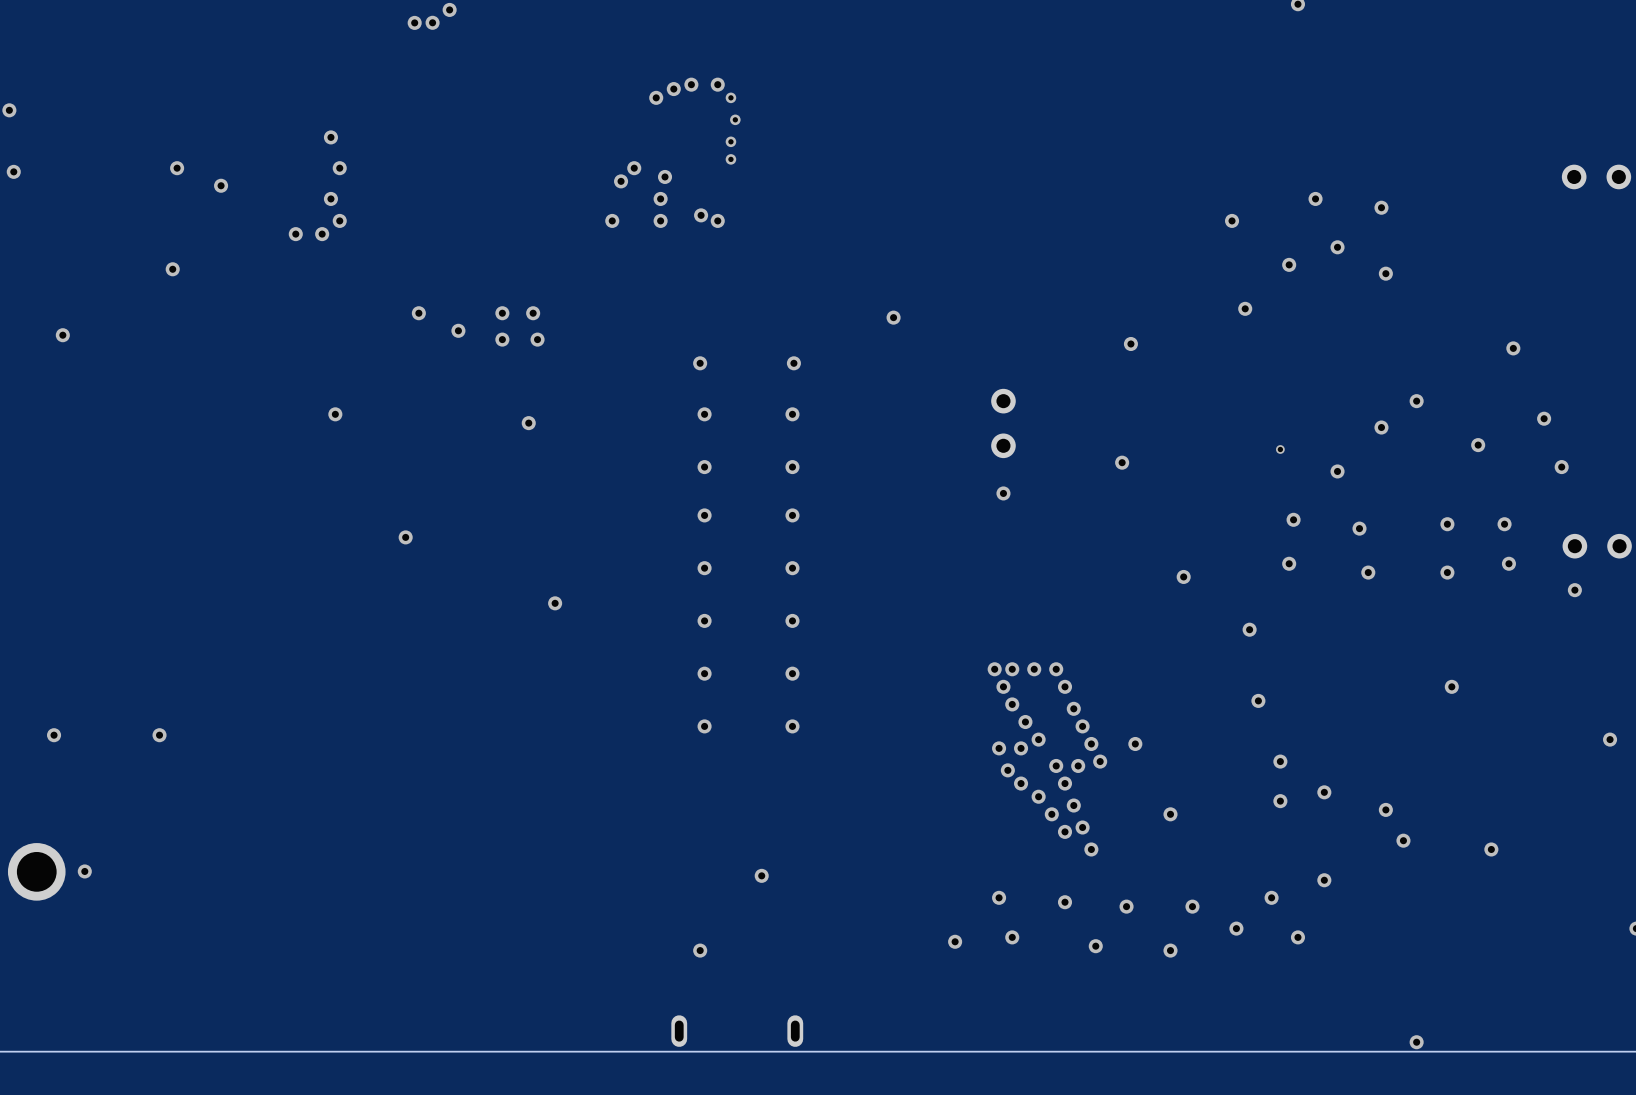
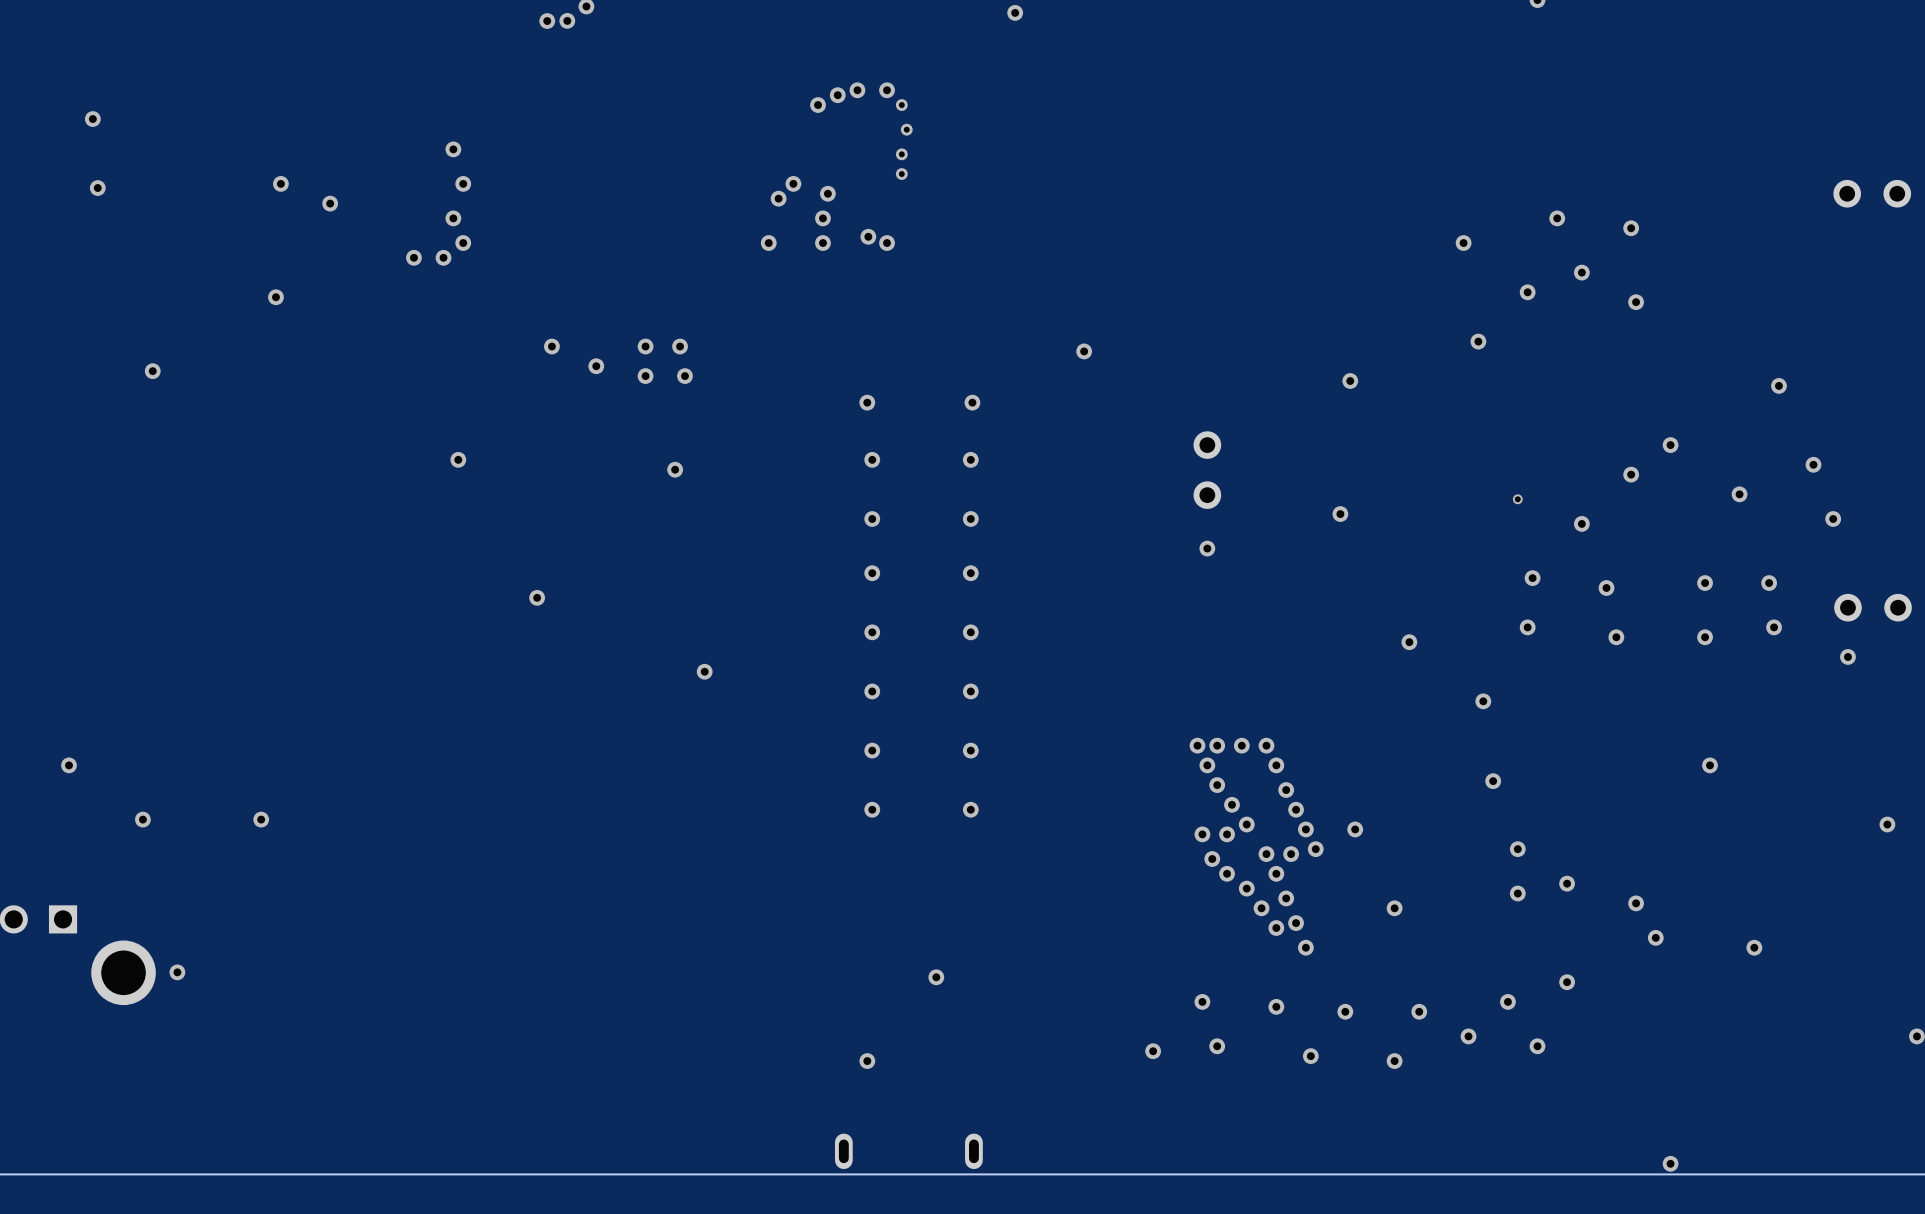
via: none -> (1015, 12)

